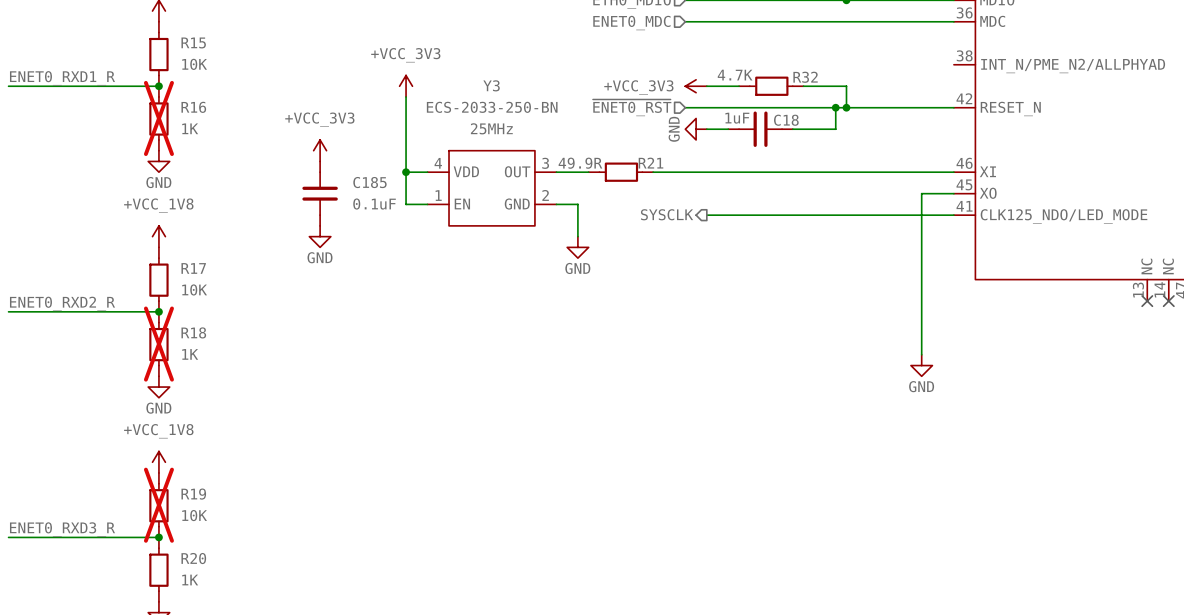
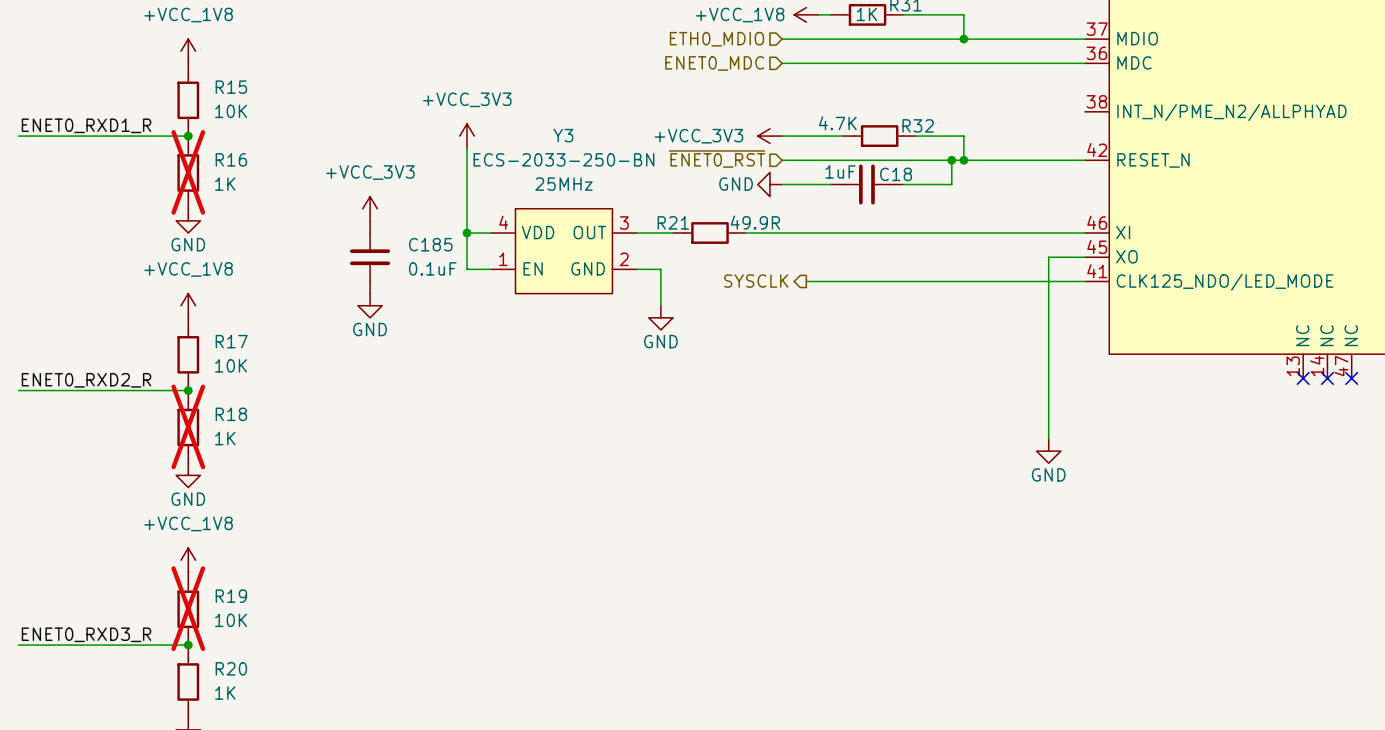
power symbol position: +VCC_3V3 (696, 86) -> +VCC_3V3 (769, 136)
power symbol text rotation: 0° (674, 129) -> 90° clockwise (736, 184)
power symbol position: GND (696, 129) -> GND (769, 184)
R21 text position: 49.9R (580, 163) -> 49.9R (755, 222)
R21 name position: R21 (650, 163) -> R21 (673, 222)

